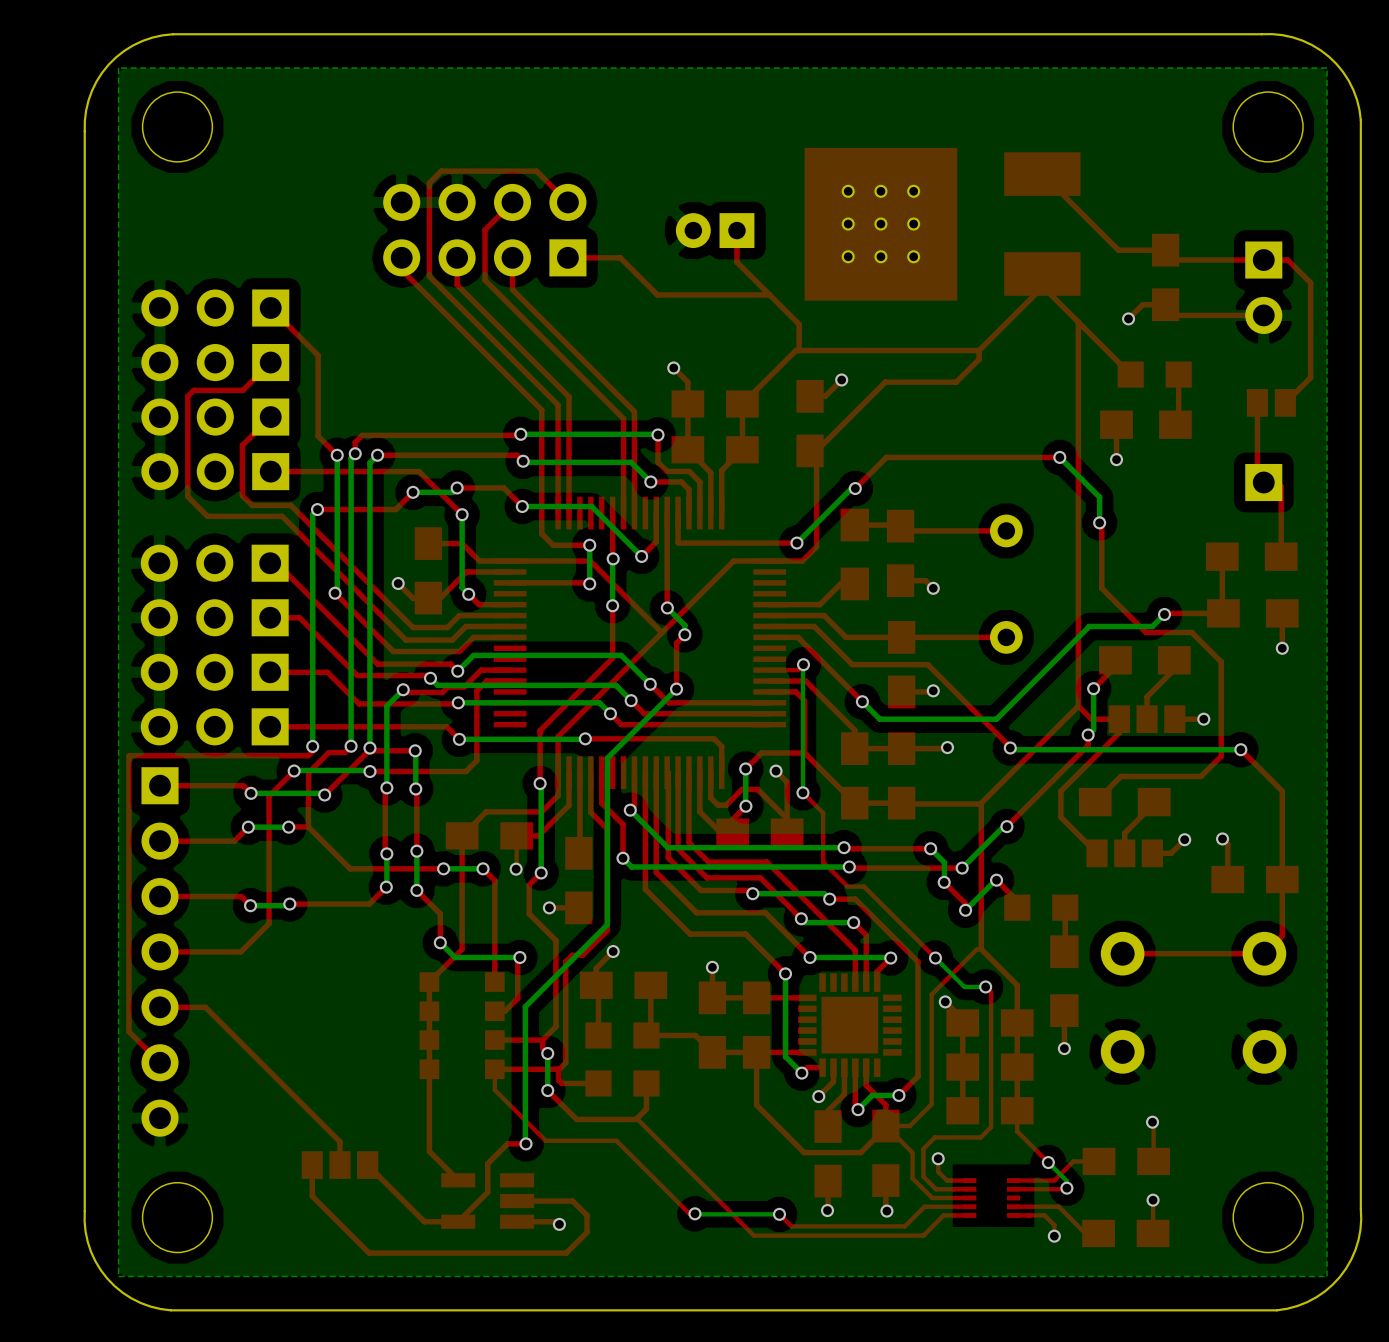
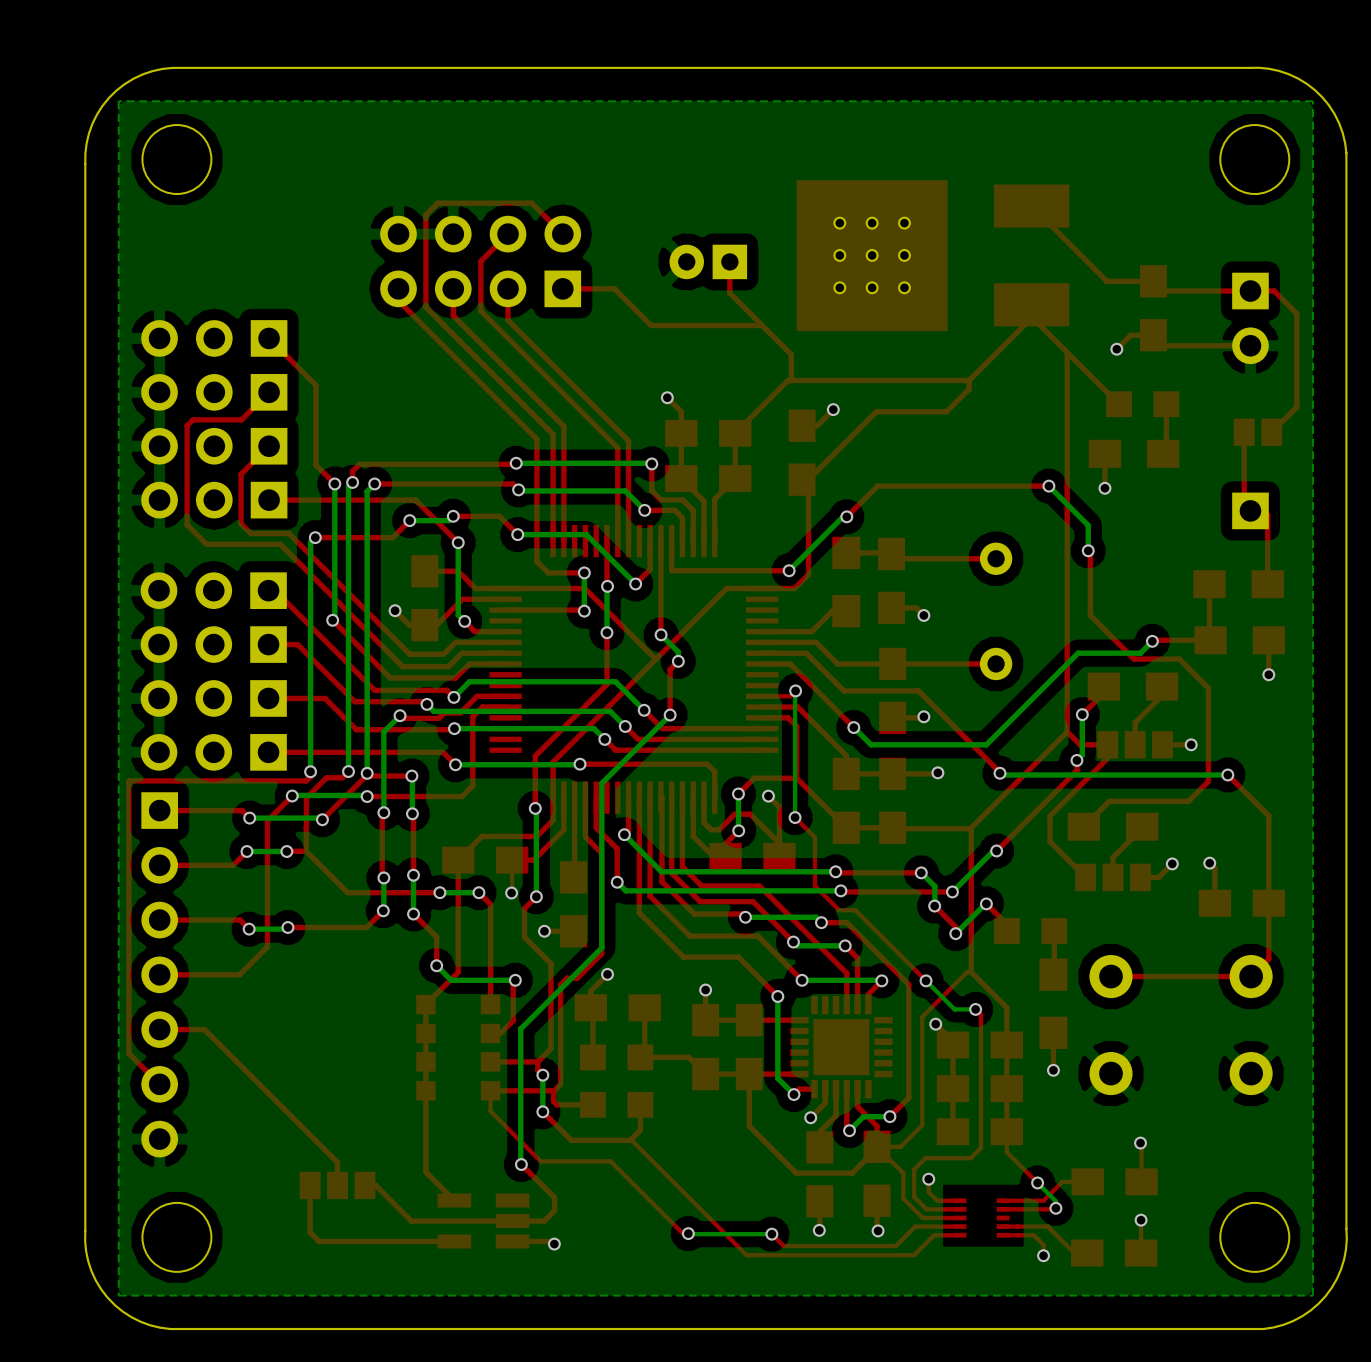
top track: (526, 1143) (507, 1143) (487, 1163) (487, 1192) (458, 1221) -> (521, 1164) (554, 1197) (554, 1210) (544, 1221)
top track: (367, 1165) (424, 1221) -> (310, 1216) (310, 1232) (319, 1241) (420, 1241)
top track: none -> (364, 1185) (375, 1185) (411, 1221) (512, 1221)
top track: (312, 1196) (369, 1253) (566, 1253) (587, 1232) (587, 1215) (572, 1201) (549, 1201) -> none

